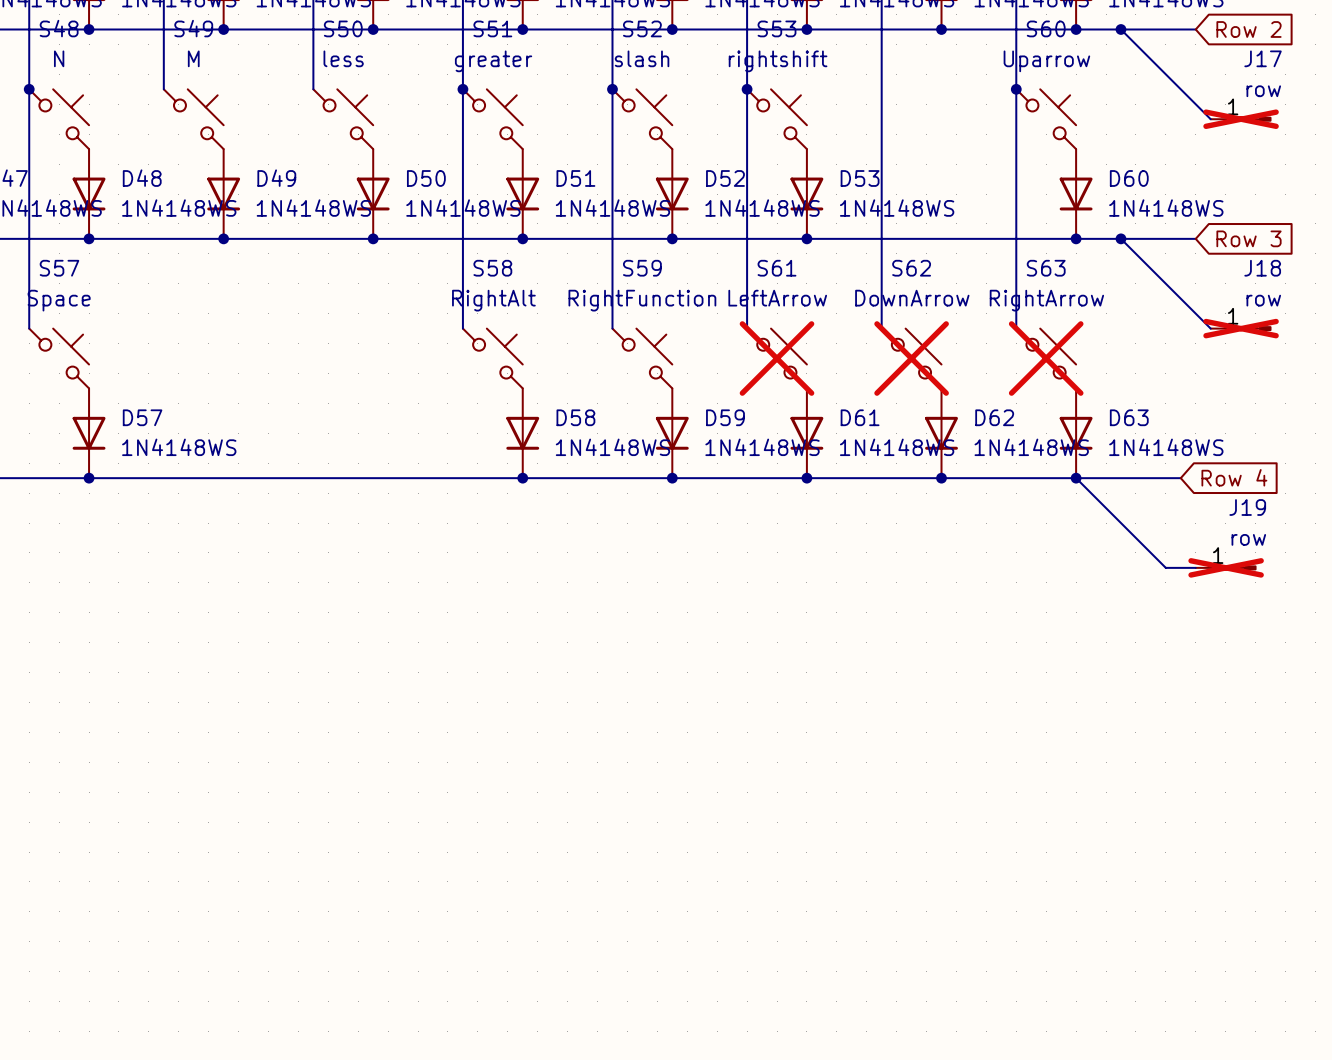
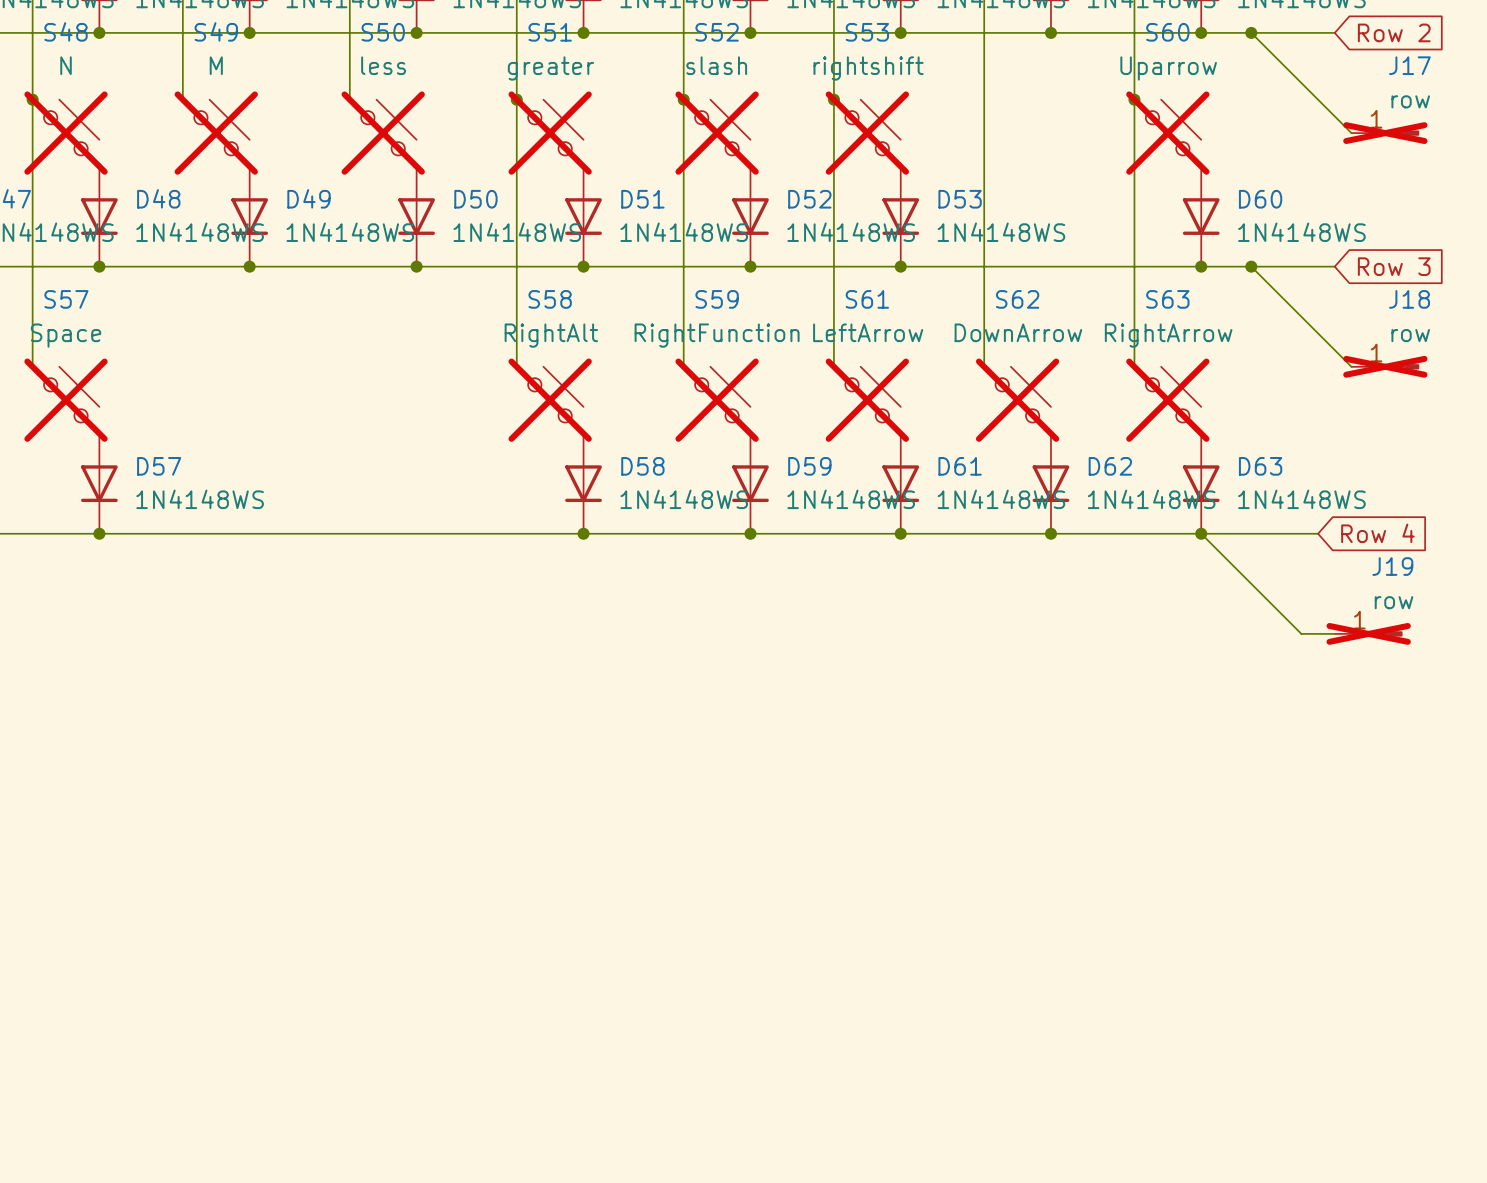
S48 do-not-place cross: none -> (66, 133)
S49 do-not-place cross: none -> (216, 133)
S50 do-not-place cross: none -> (383, 133)
S51 do-not-place cross: none -> (550, 133)
S52 do-not-place cross: none -> (717, 133)
S53 do-not-place cross: none -> (867, 133)
S60 do-not-place cross: none -> (1167, 133)
S57 do-not-place cross: none -> (66, 400)
S58 do-not-place cross: none -> (550, 400)
S59 do-not-place cross: none -> (717, 400)

